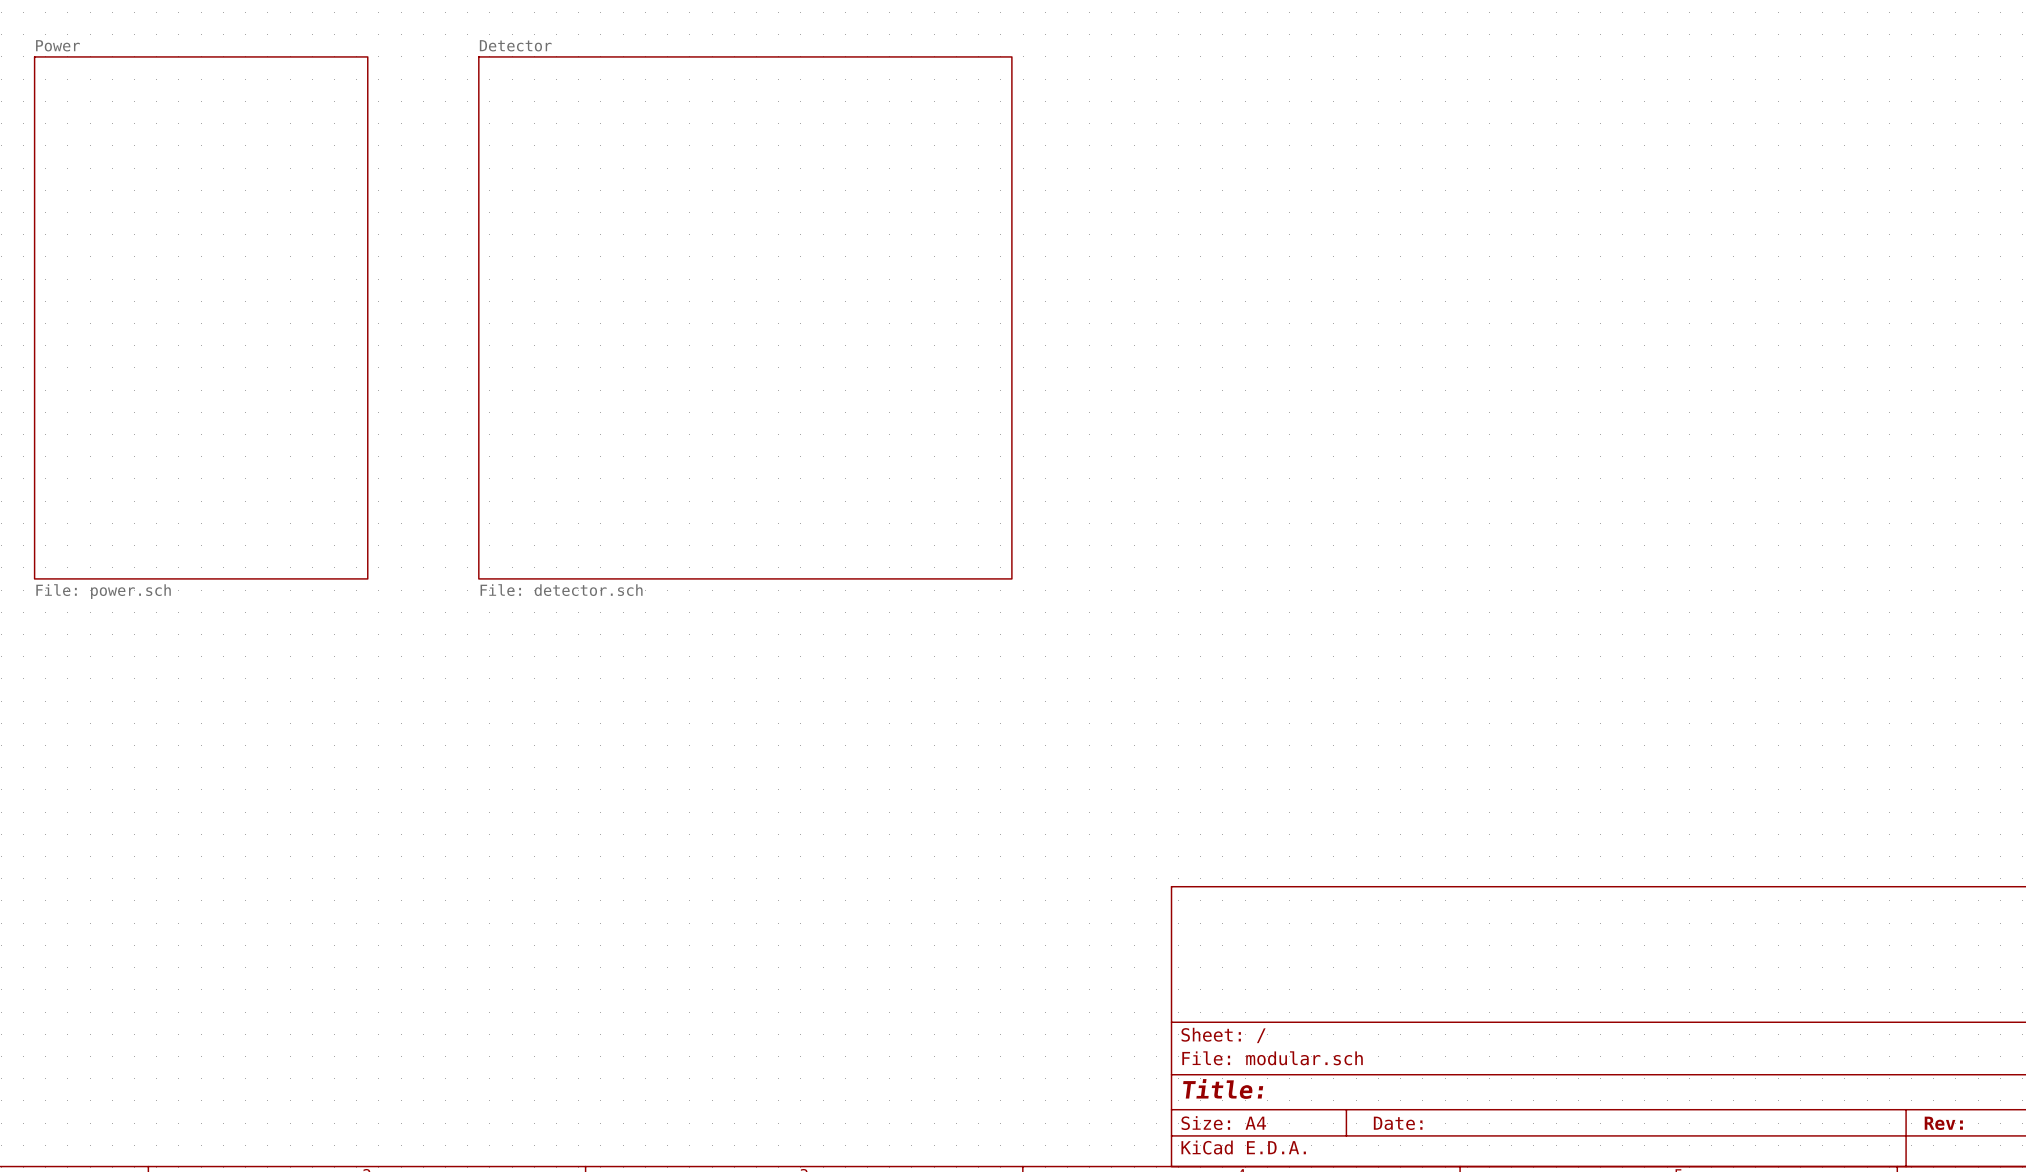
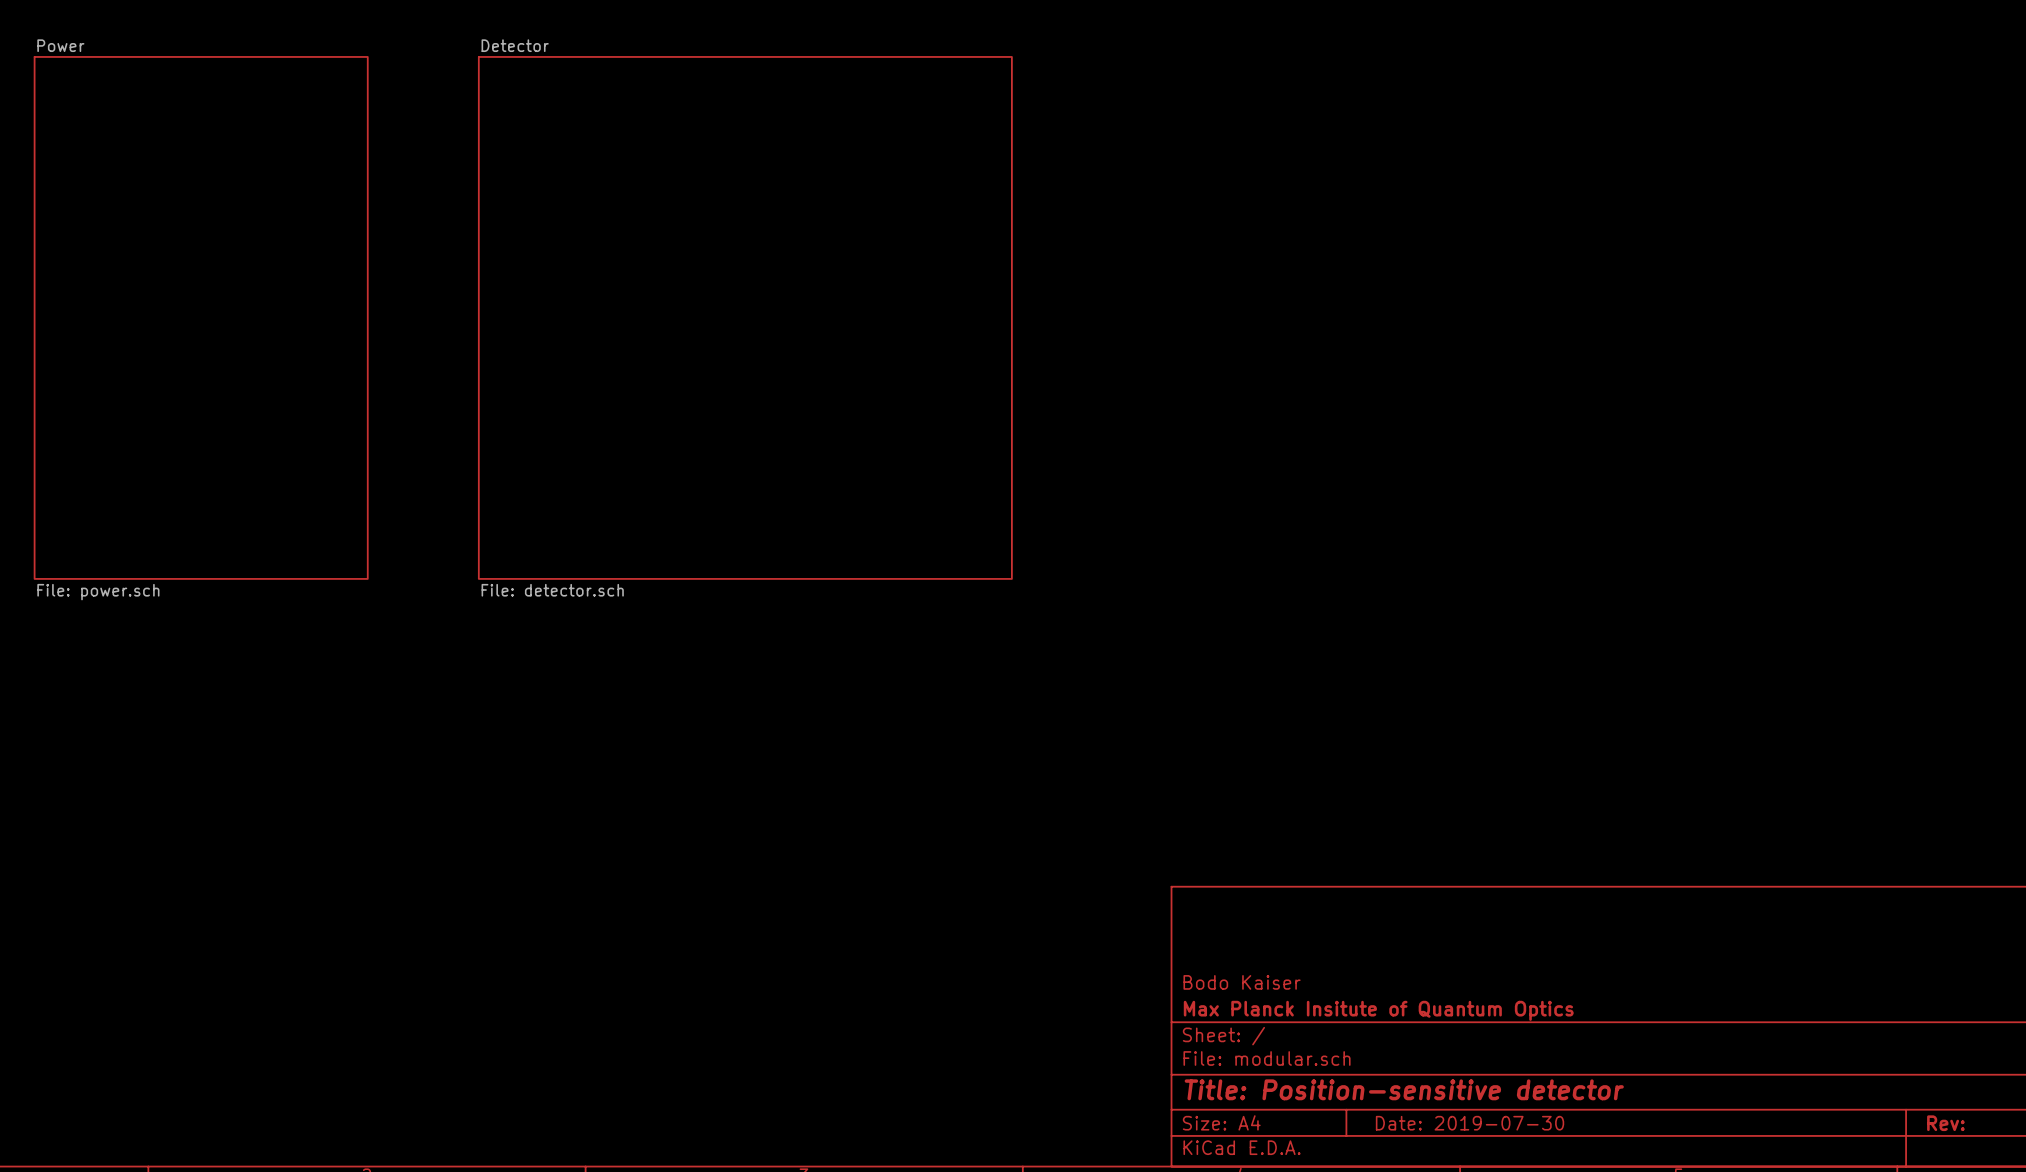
title block: none -> Bodo Kaiser (1242, 982)
title block: none -> Max Planck Insitute of Quantum Optics (1378, 1010)
title block: Title: (1223, 1088) -> Title: Position-sensitive detector (1404, 1089)
title block: Date: (1398, 1123) -> Date: 2019-07-30 (1470, 1123)

